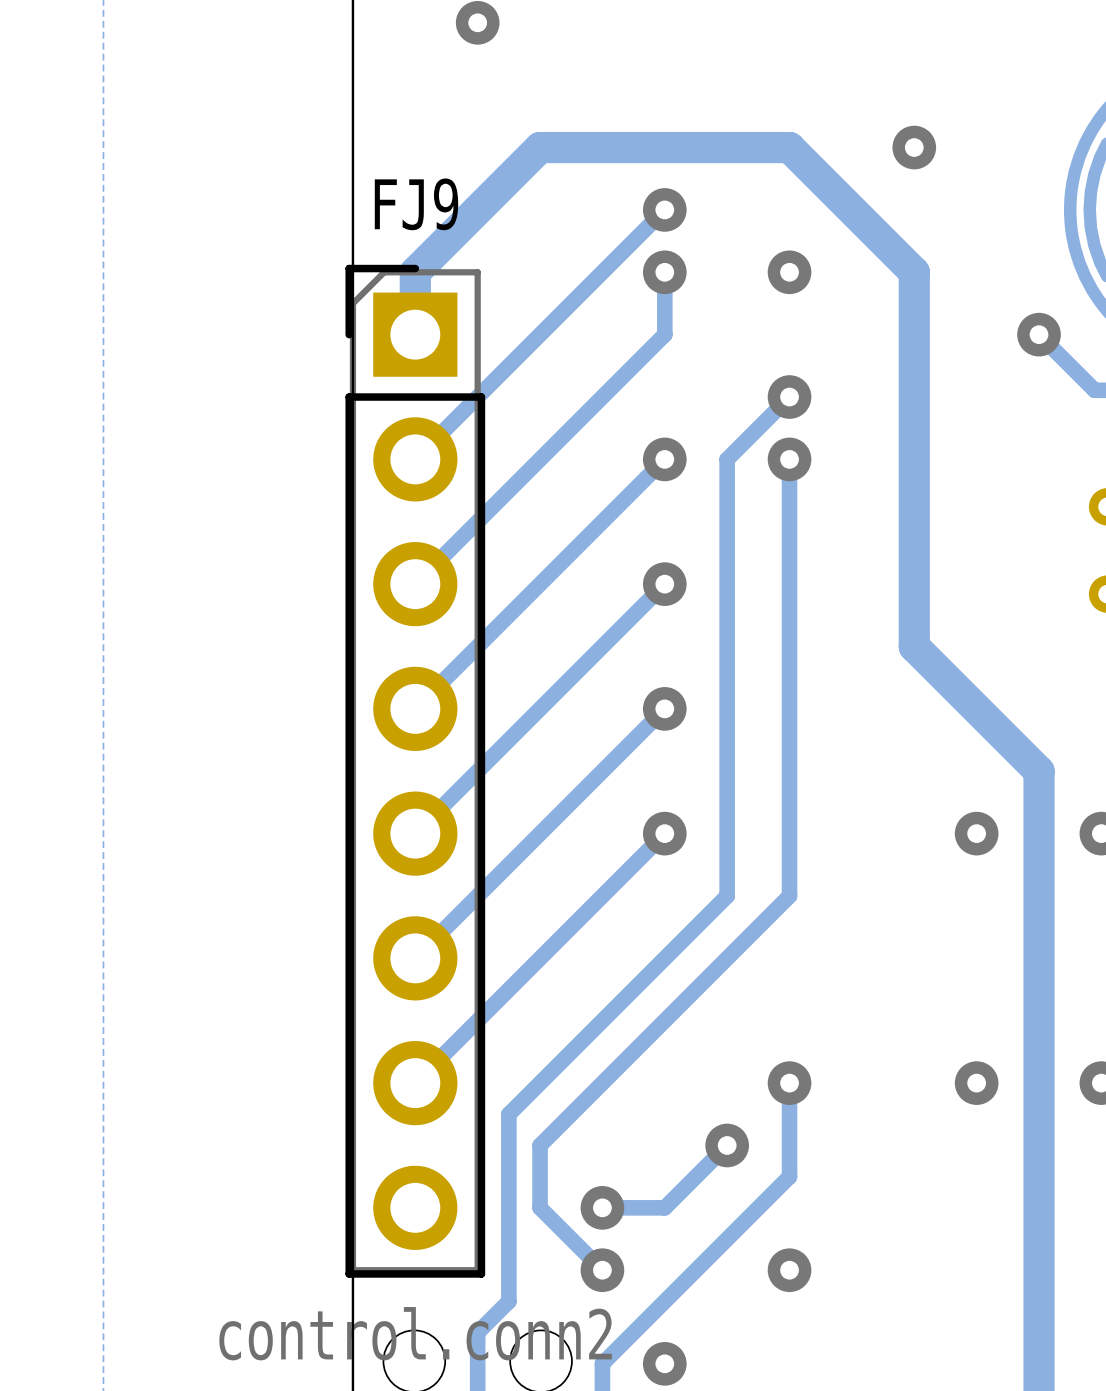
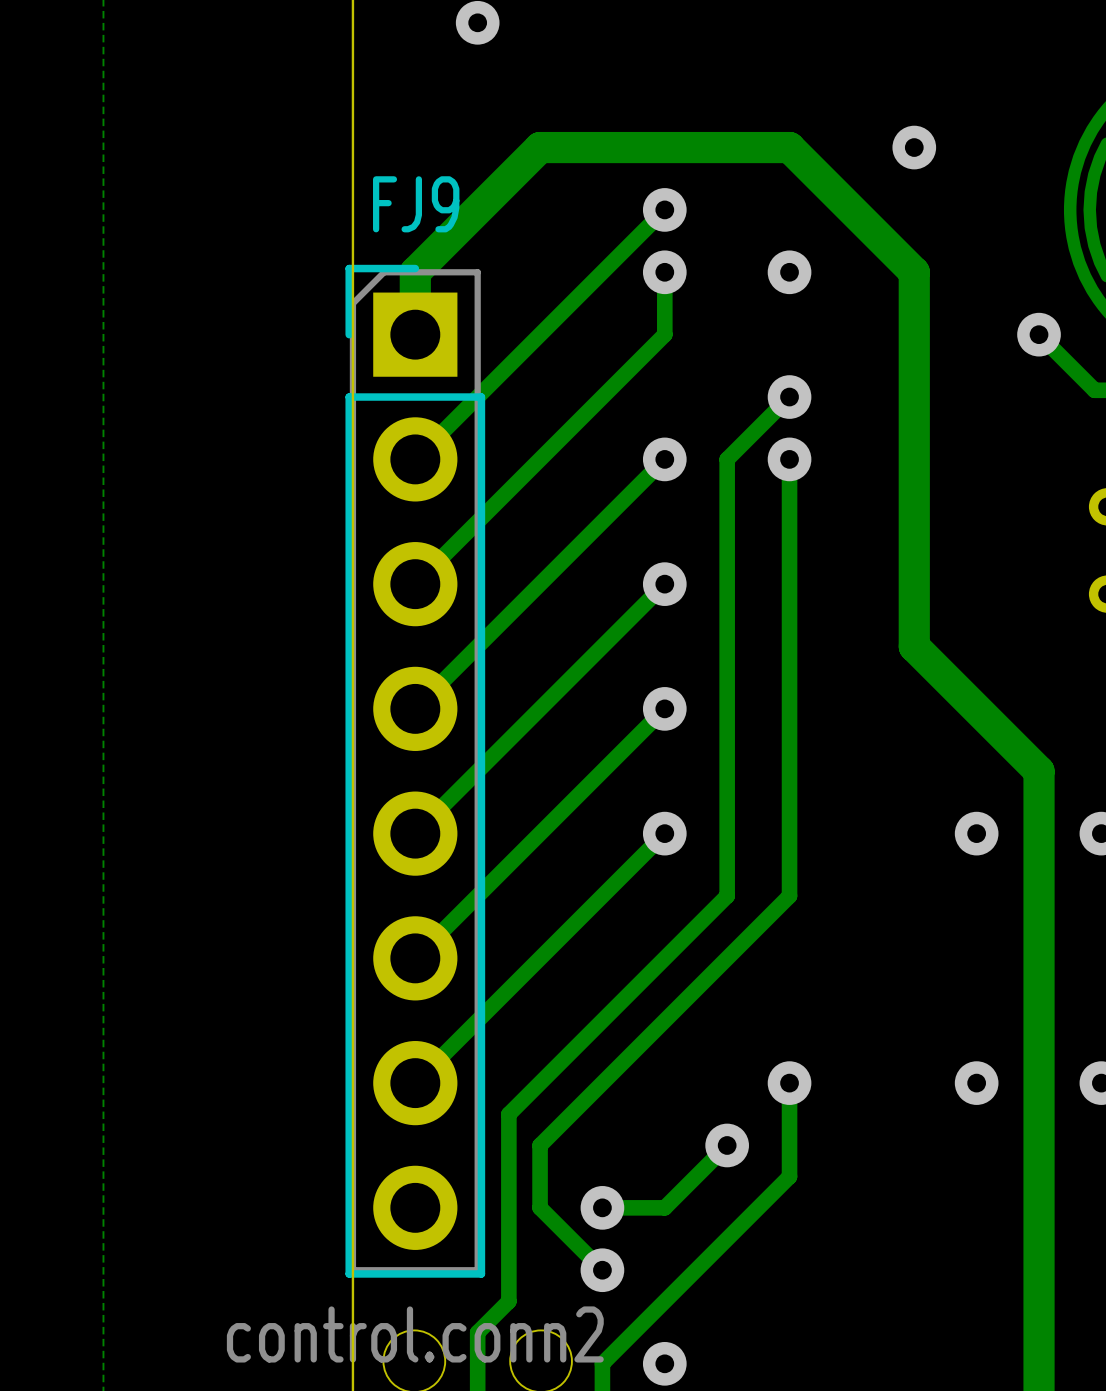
via: (789, 1270) -> none

